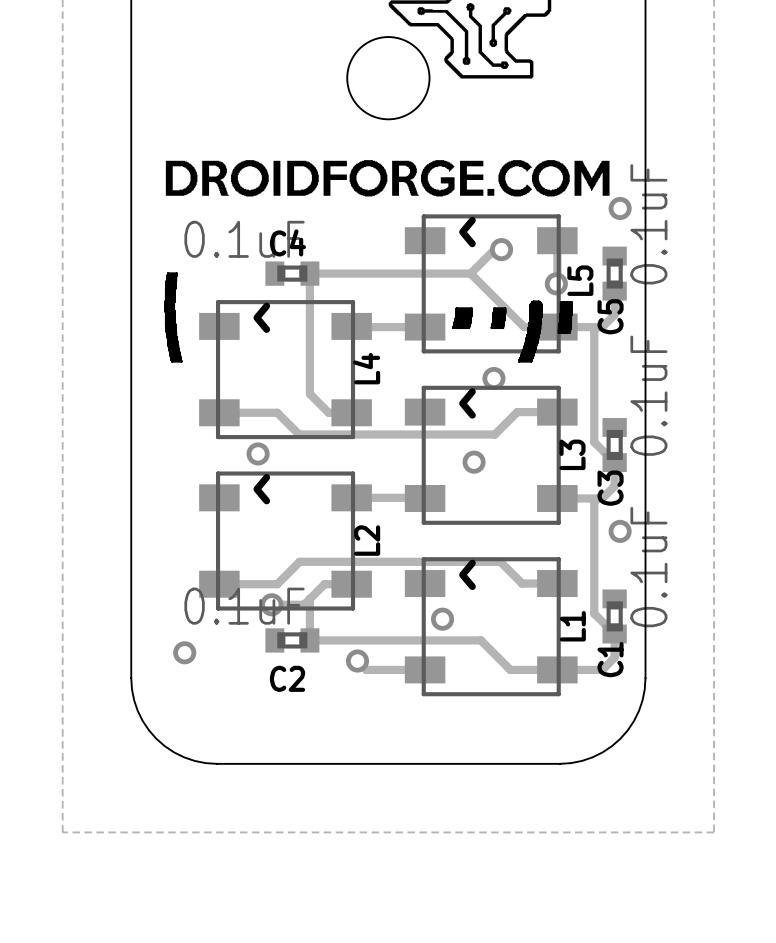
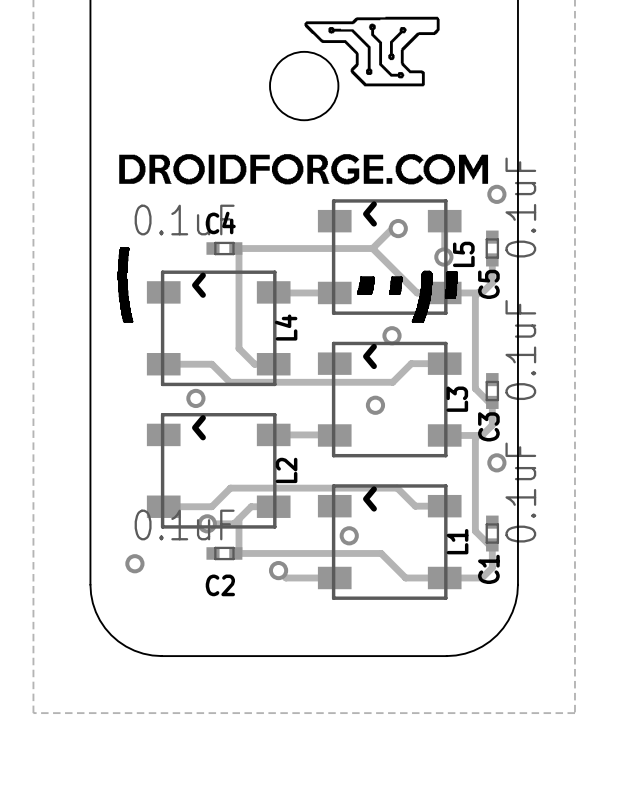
C5 footprint: [602, 246, 627, 301] -> [485, 230, 500, 267]
C4 footprint: [265, 261, 320, 286] -> [206, 241, 243, 256]
C3 footprint: [602, 418, 627, 473] -> [485, 373, 500, 409]
C1 footprint: [602, 589, 627, 644] -> [485, 515, 500, 552]
C2 footprint: [265, 628, 320, 653] -> [206, 546, 243, 561]

